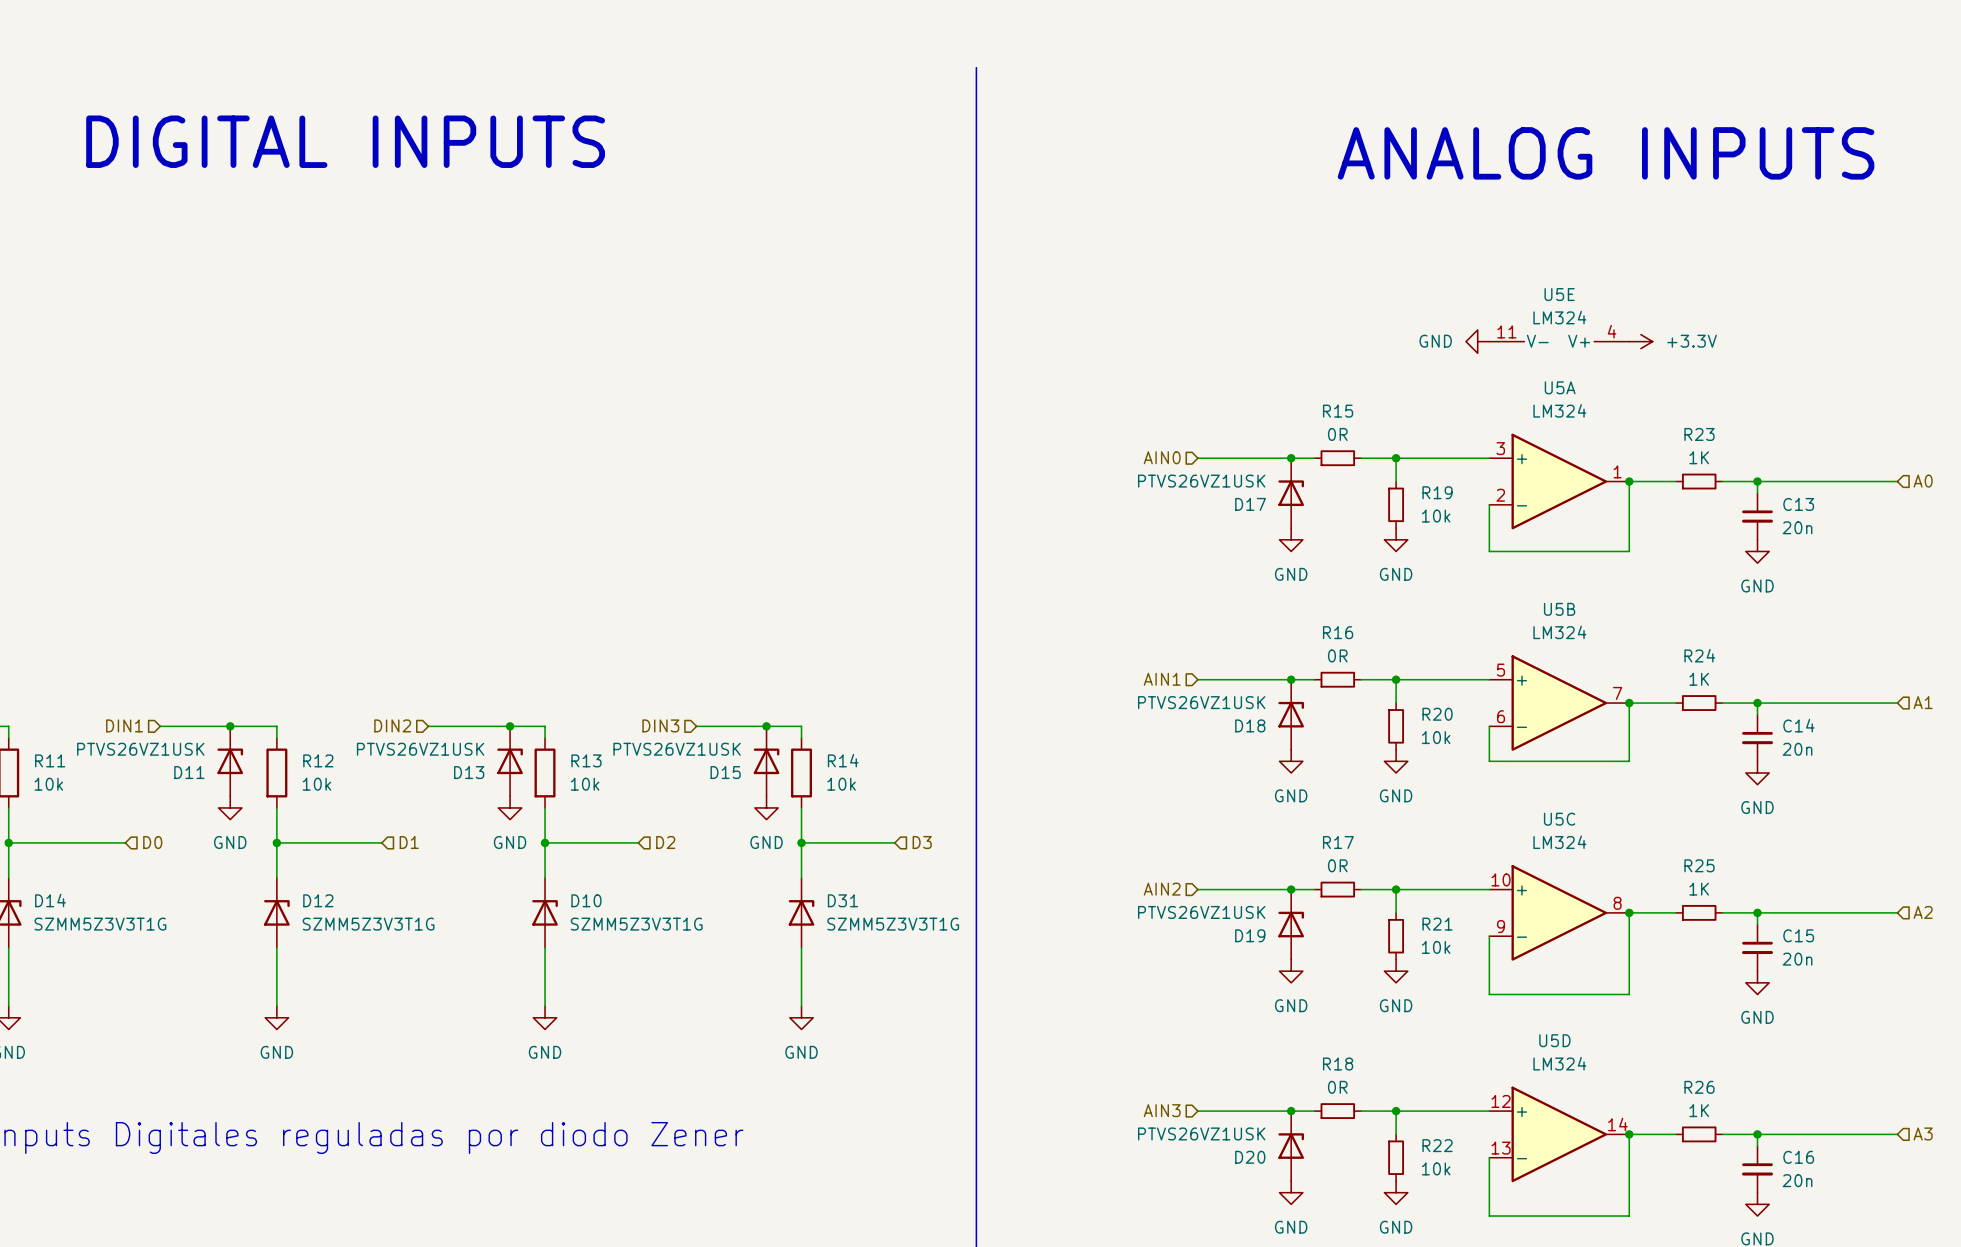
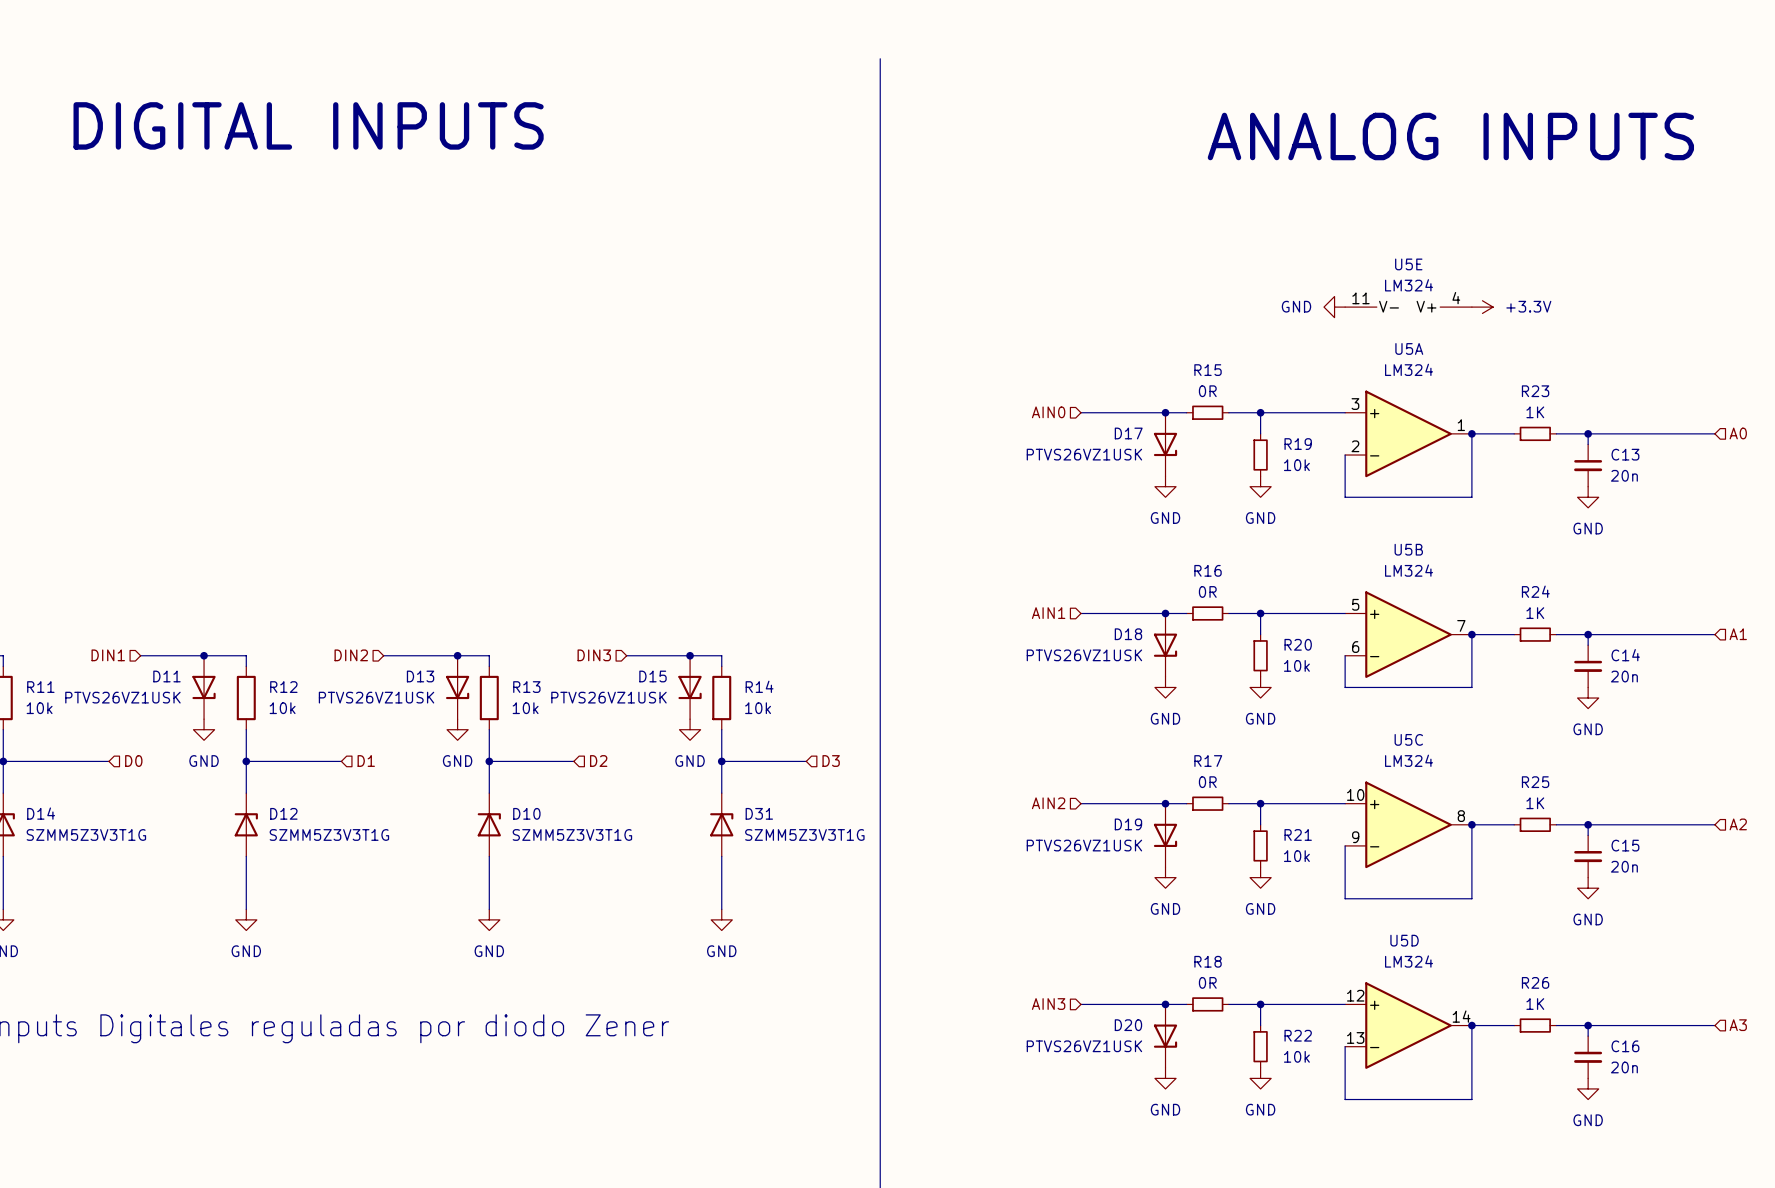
D17 flip: as is (1291, 493) -> up-down (1165, 444)
D18 flip: as is (1291, 714) -> up-down (1165, 645)
D11 flip: as is (230, 761) -> up-down (204, 687)
D13 flip: as is (510, 761) -> up-down (457, 687)
D15 flip: as is (766, 761) -> up-down (690, 687)
D19 flip: as is (1291, 924) -> up-down (1165, 835)
D20 flip: as is (1291, 1146) -> up-down (1165, 1036)

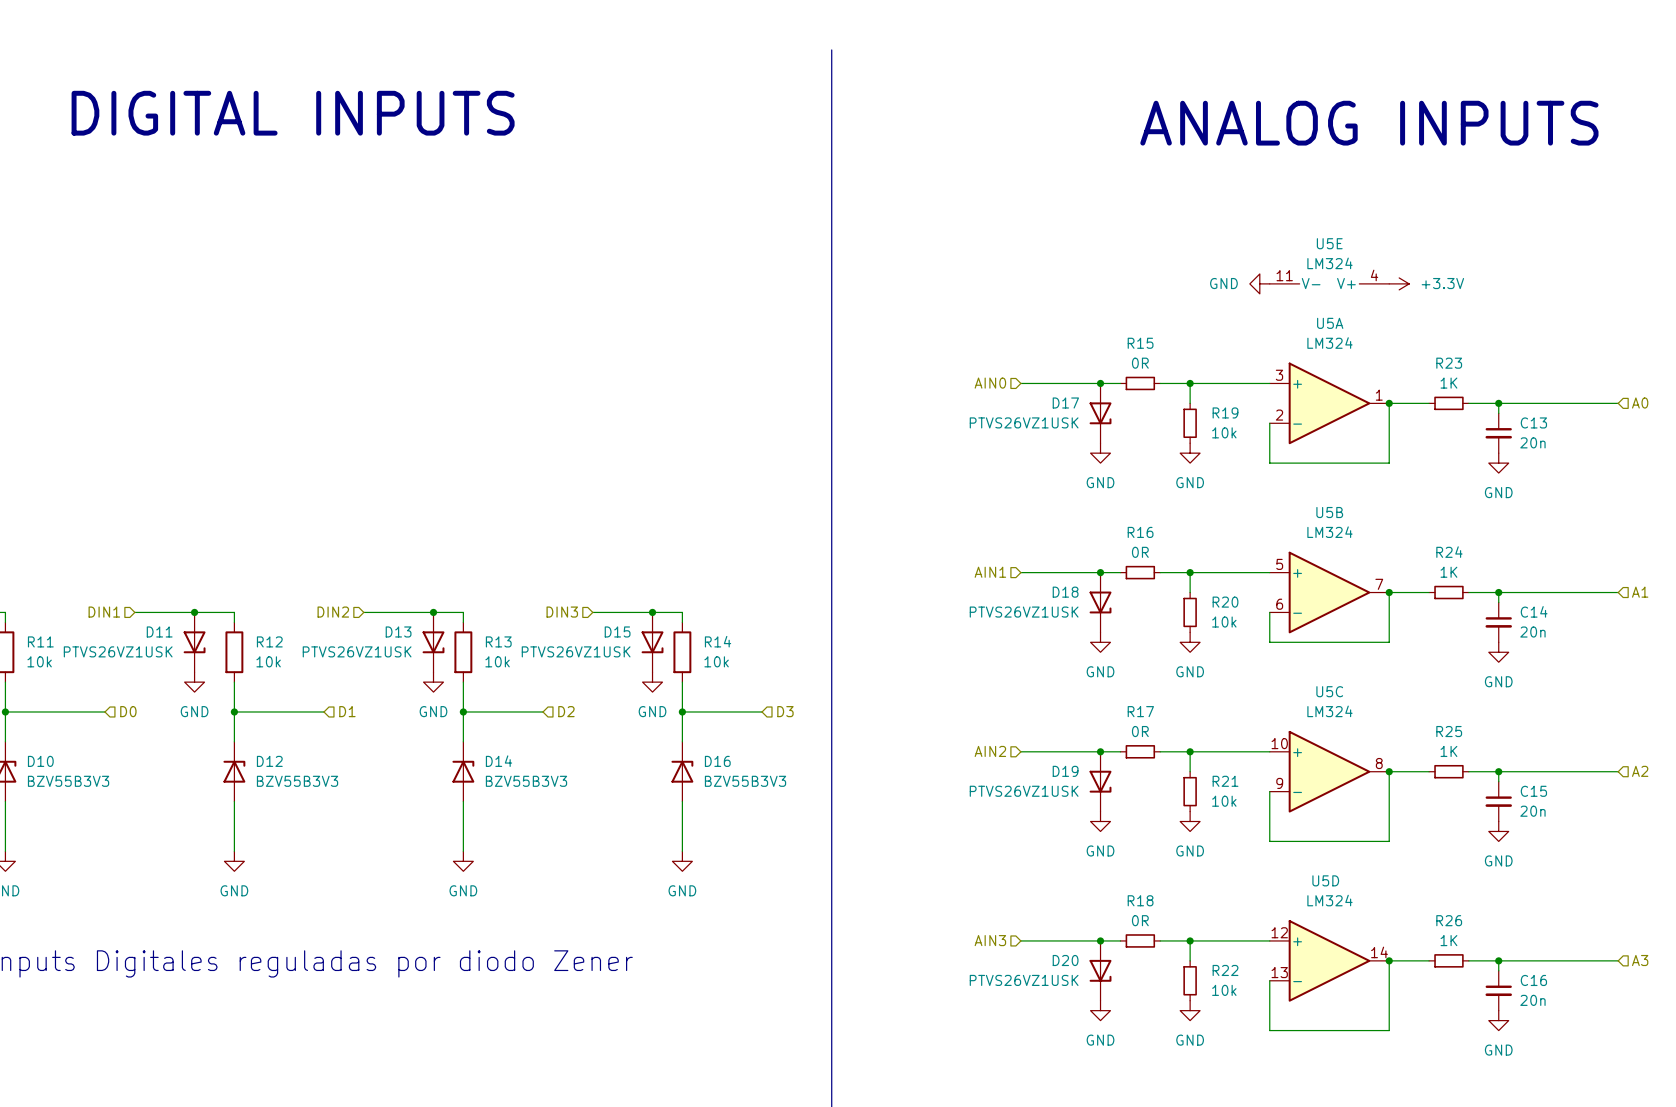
D14 name: D14 (41, 813) -> D10 (40, 761)
D10 name: D10 (526, 813) -> D14 (499, 761)
D31 name: D31 (759, 813) -> D16 (717, 761)
D14 value: SZMM5Z3V3T1G (86, 834) -> BZV55B3V3 (68, 781)
D12 value: SZMM5Z3V3T1G (329, 834) -> BZV55B3V3 (297, 781)
D10 value: SZMM5Z3V3T1G (572, 834) -> BZV55B3V3 (526, 781)
D31 value: SZMM5Z3V3T1G (804, 834) -> BZV55B3V3 (745, 781)

